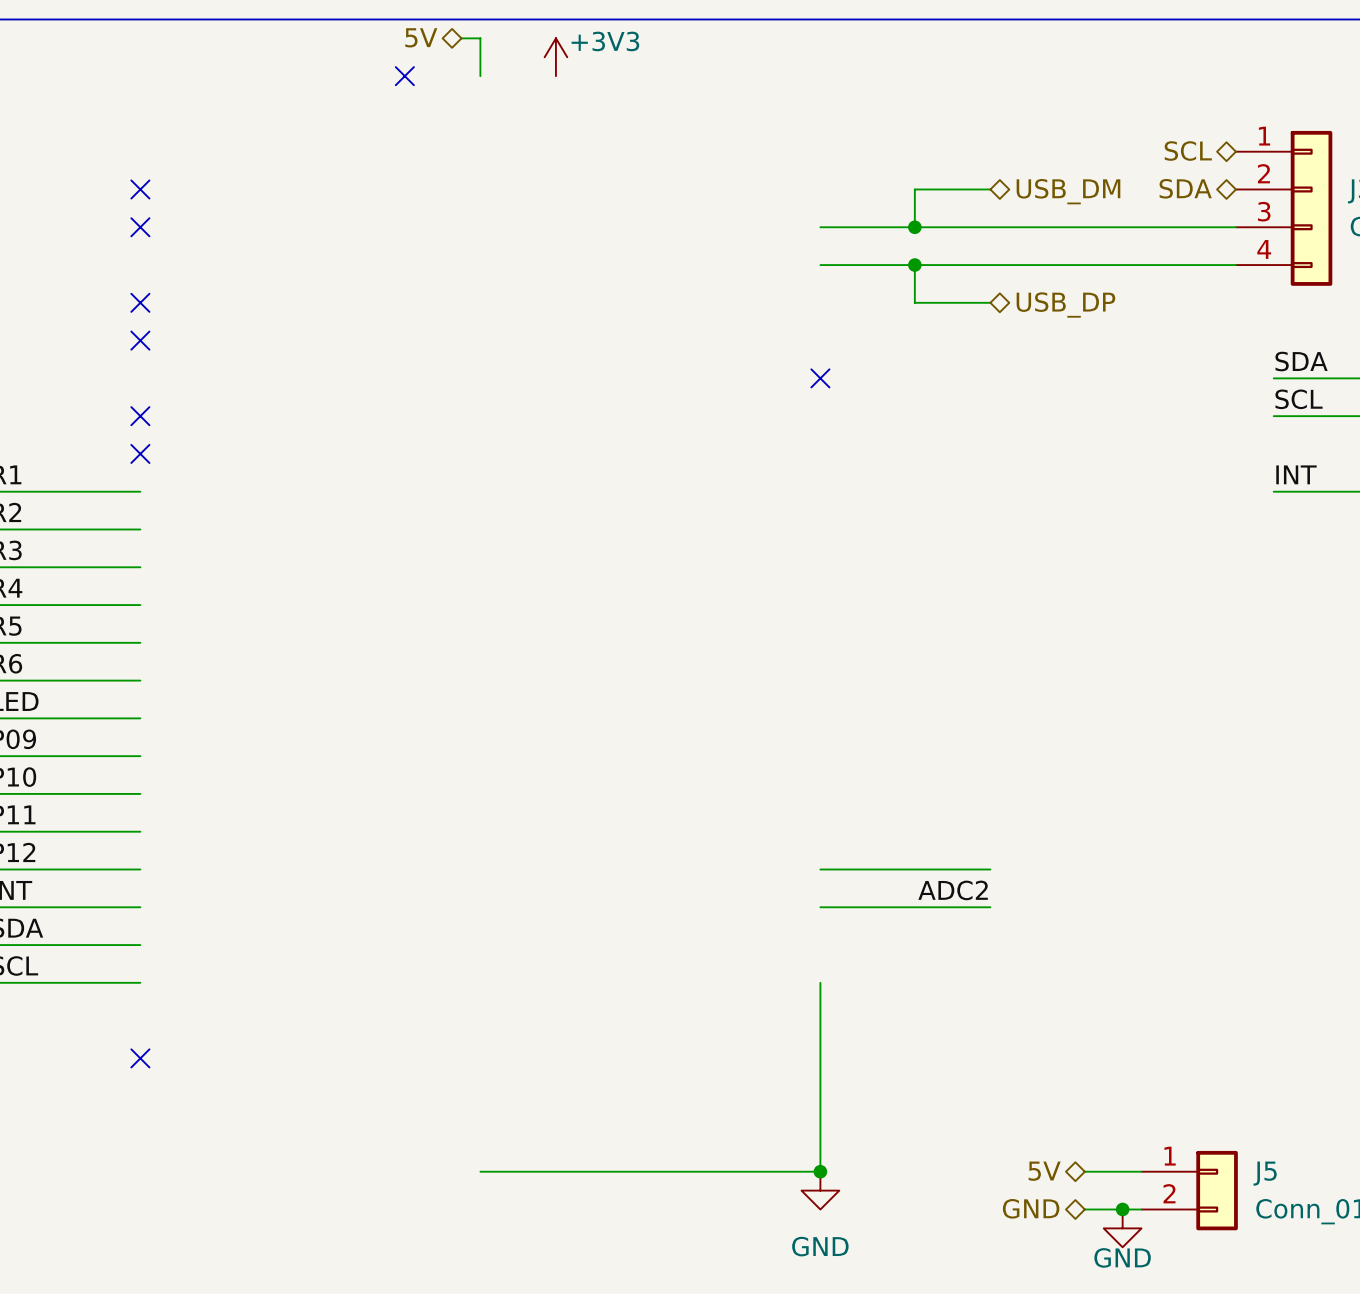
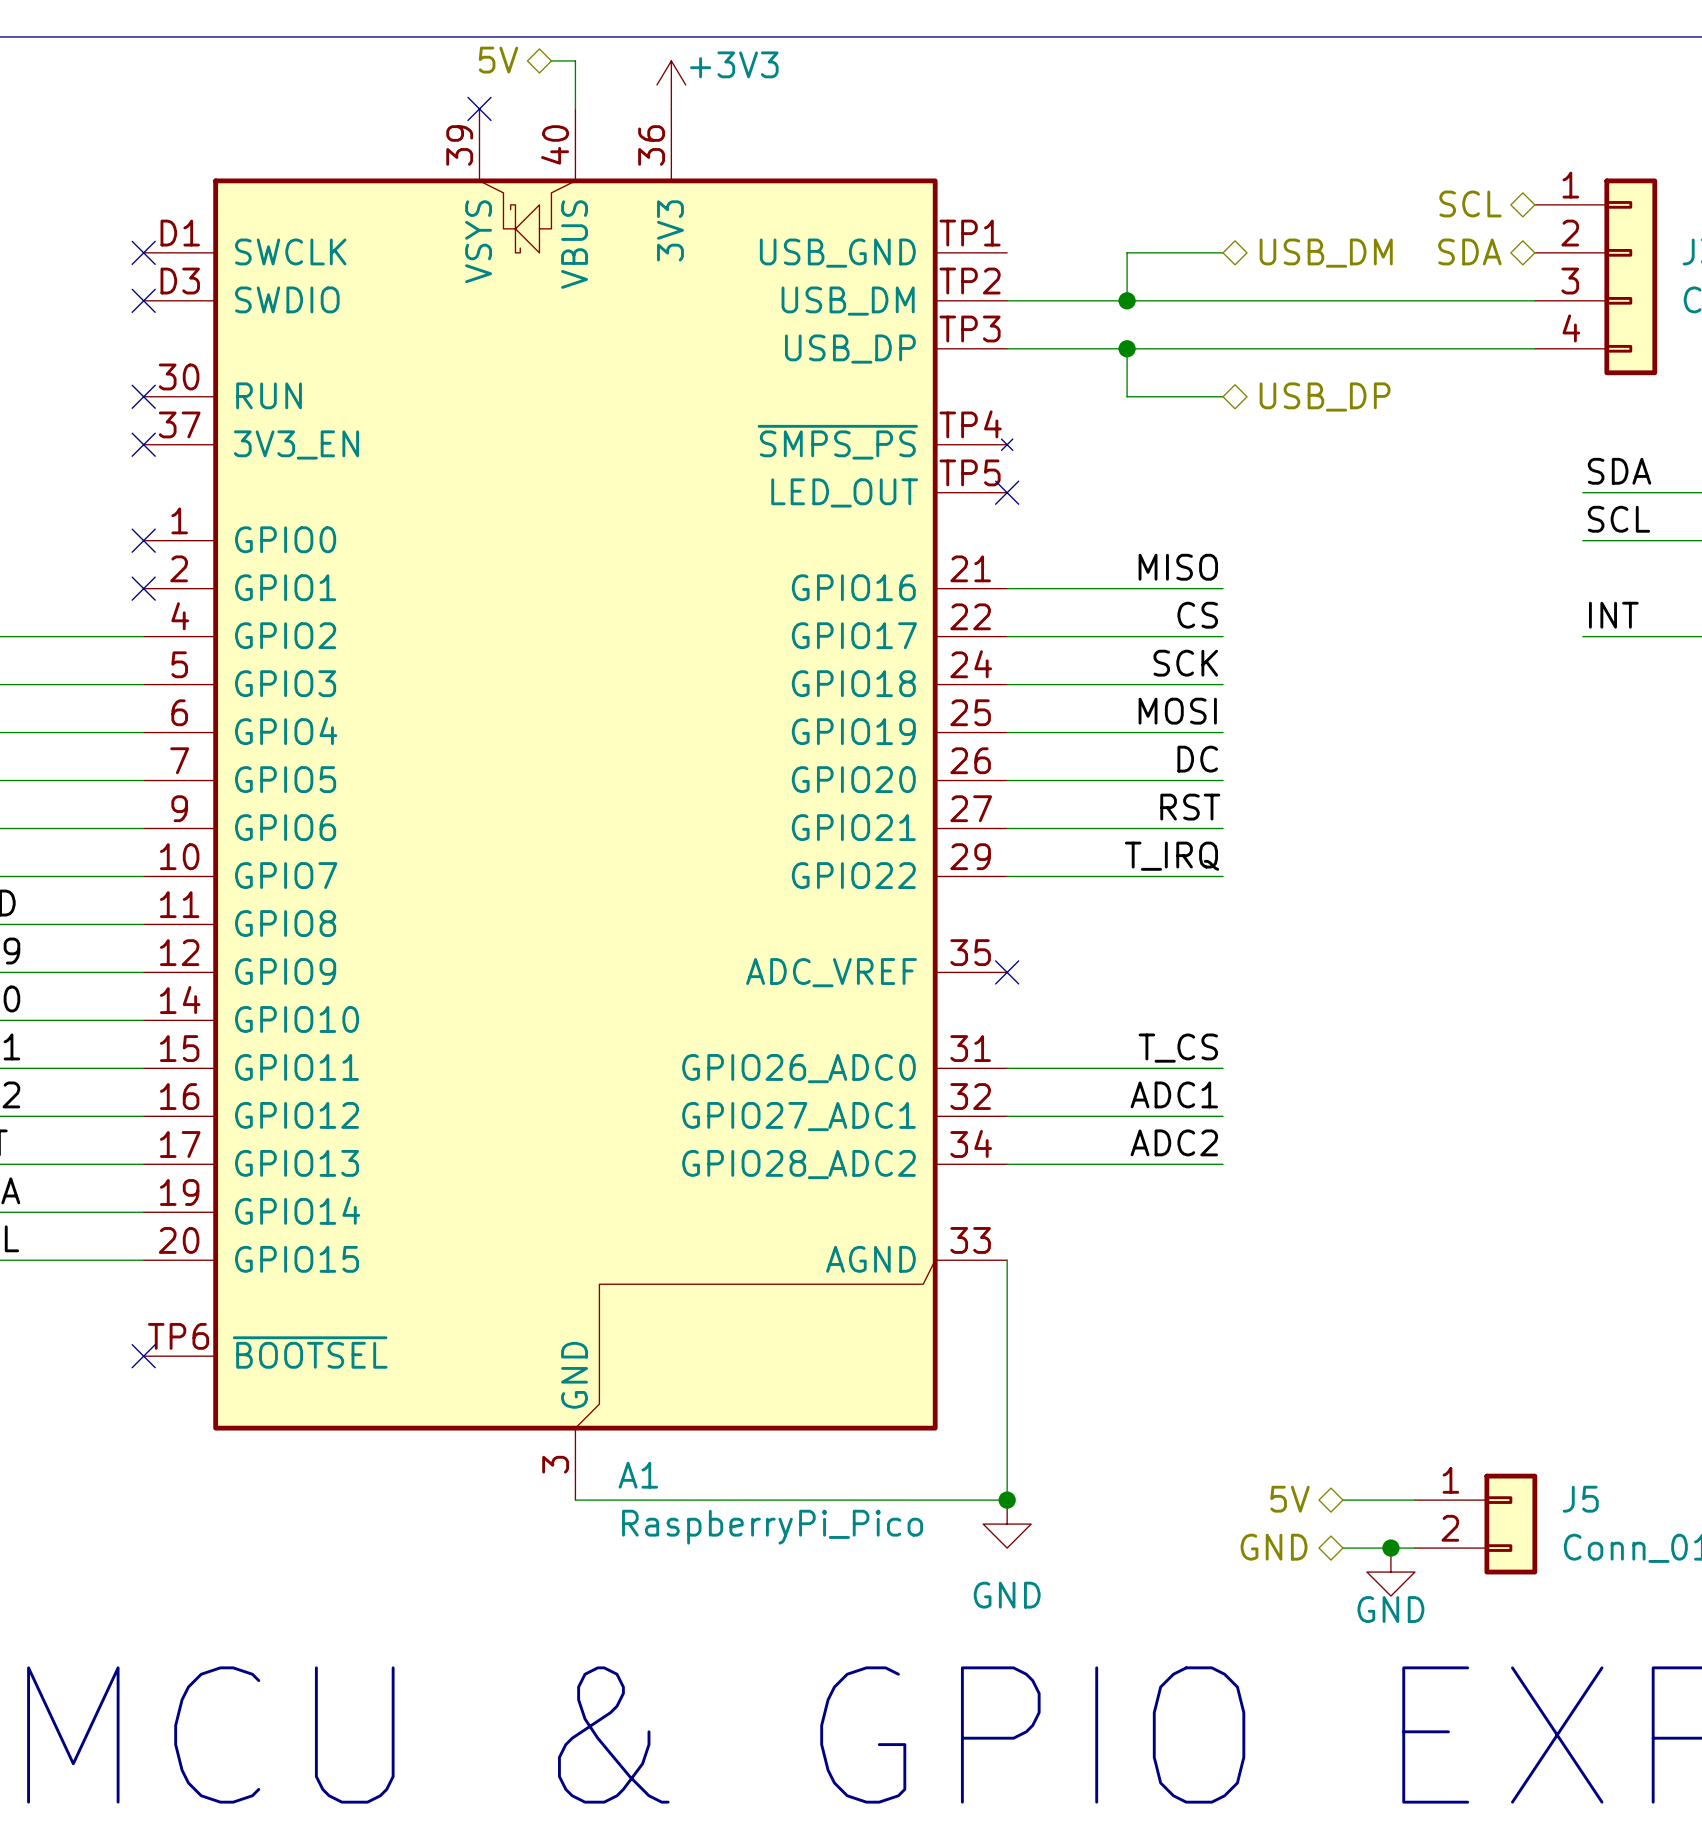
label: none -> MISO (1178, 567)
wire: none -> (1007, 588) (1223, 588)
label: none -> CS (1197, 615)
wire: none -> (1007, 636) (1223, 636)
label: none -> SCK (1185, 663)
wire: none -> (1007, 684) (1223, 684)
label: none -> MOSI (1177, 711)
wire: none -> (1007, 732) (1223, 732)
label: none -> DC (1197, 759)
wire: none -> (1007, 780) (1223, 780)
A1: none -> RaspberryPi_Pico (578, 804)
label: none -> RST (1190, 807)
wire: none -> (1007, 828) (1223, 828)
label: none -> T_IRQ (1172, 856)
wire: none -> (1007, 876) (1223, 876)
no-connect mark: none -> (1007, 972)
label: none -> T_CS (1178, 1048)
wire: none -> (1007, 1068) (1223, 1068)
label: none -> ADC1 (1174, 1094)

